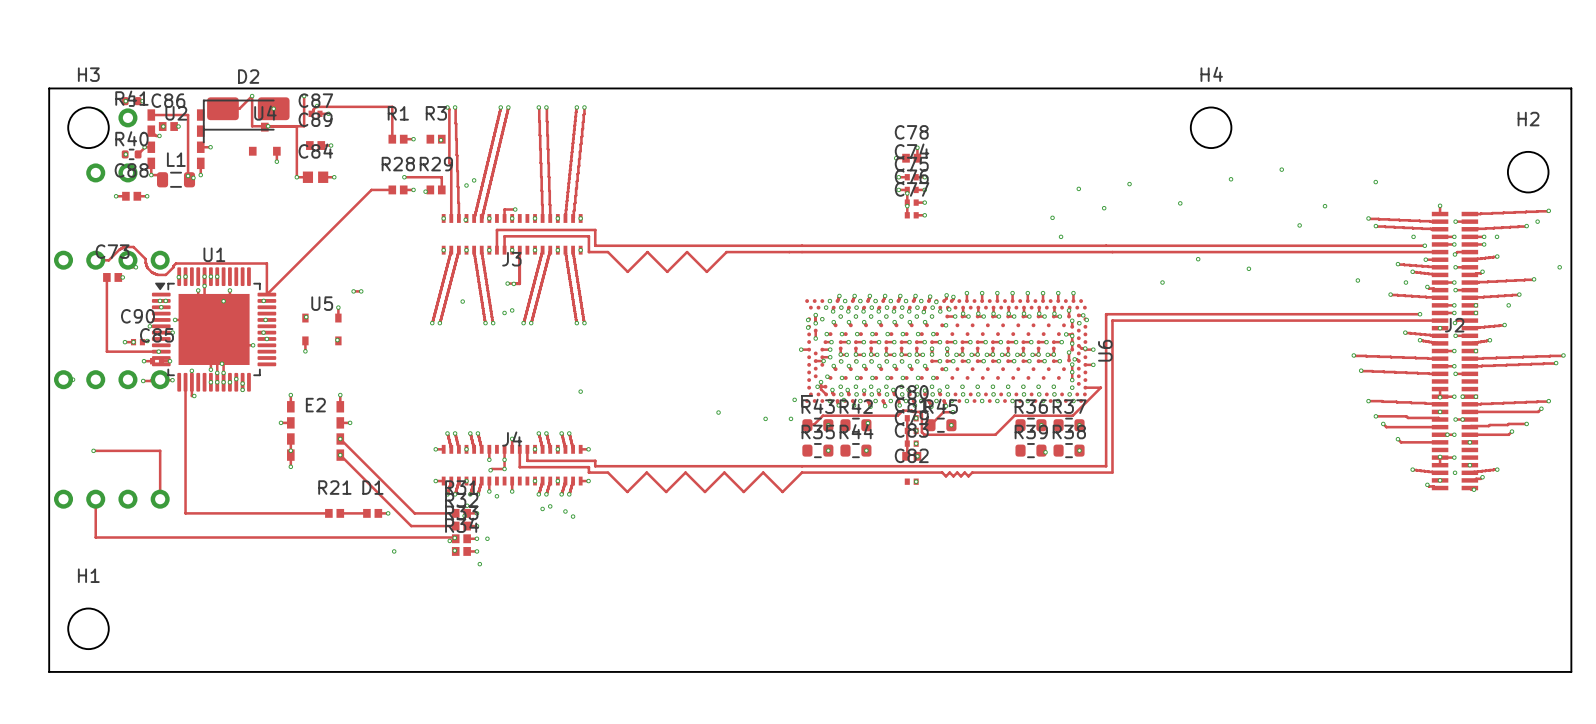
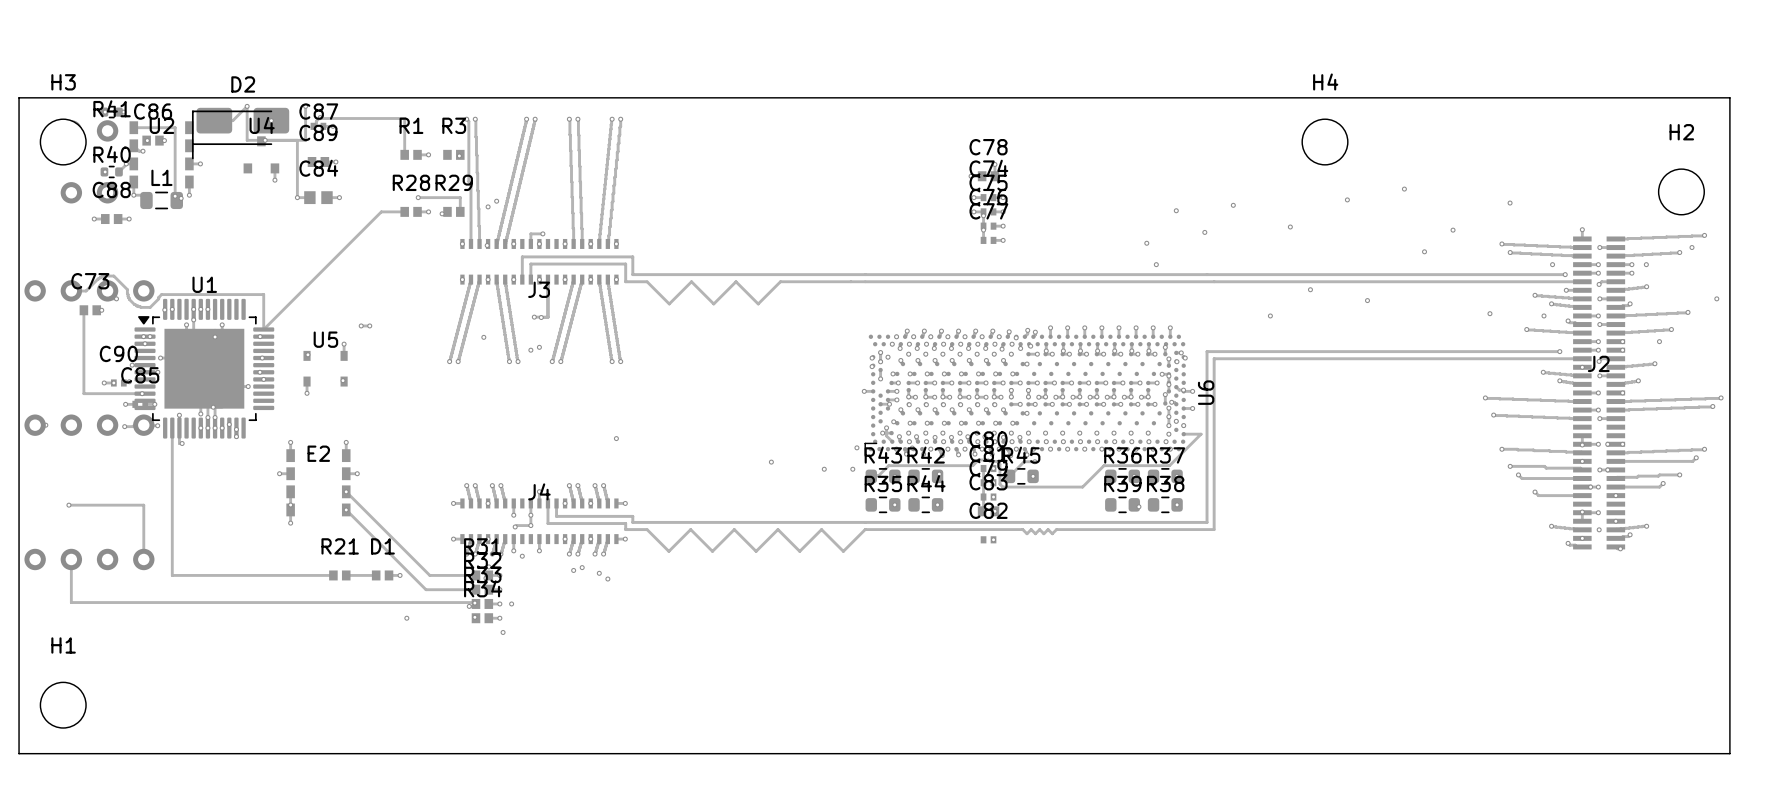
via: none -> (1176, 421)
via: none -> (1183, 425)

